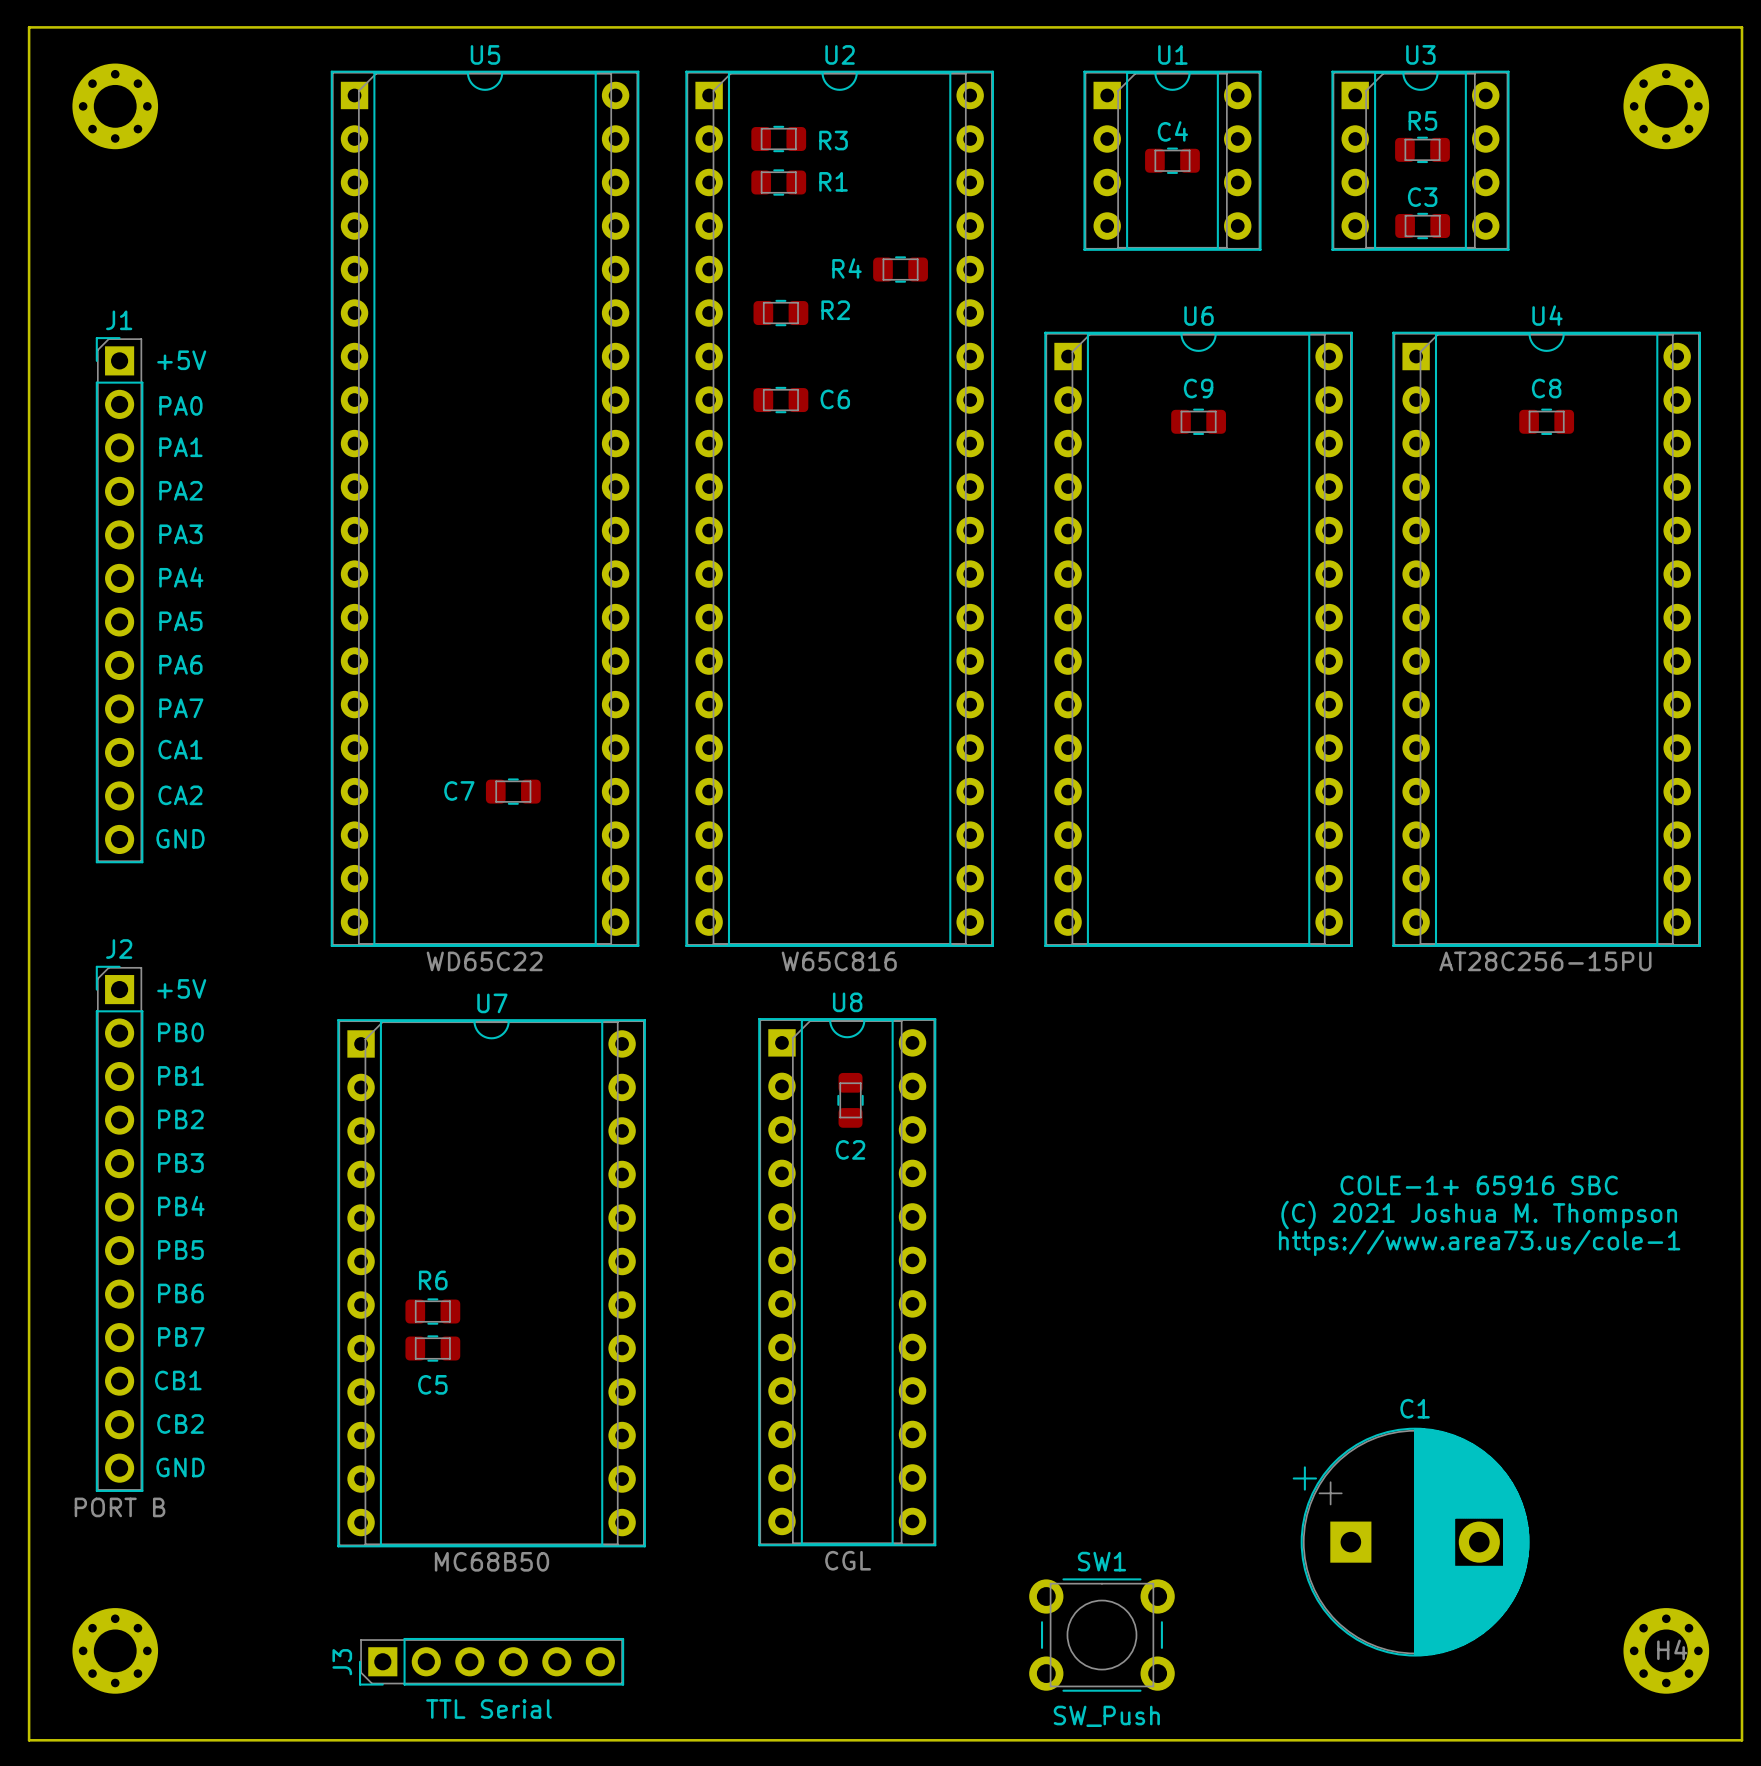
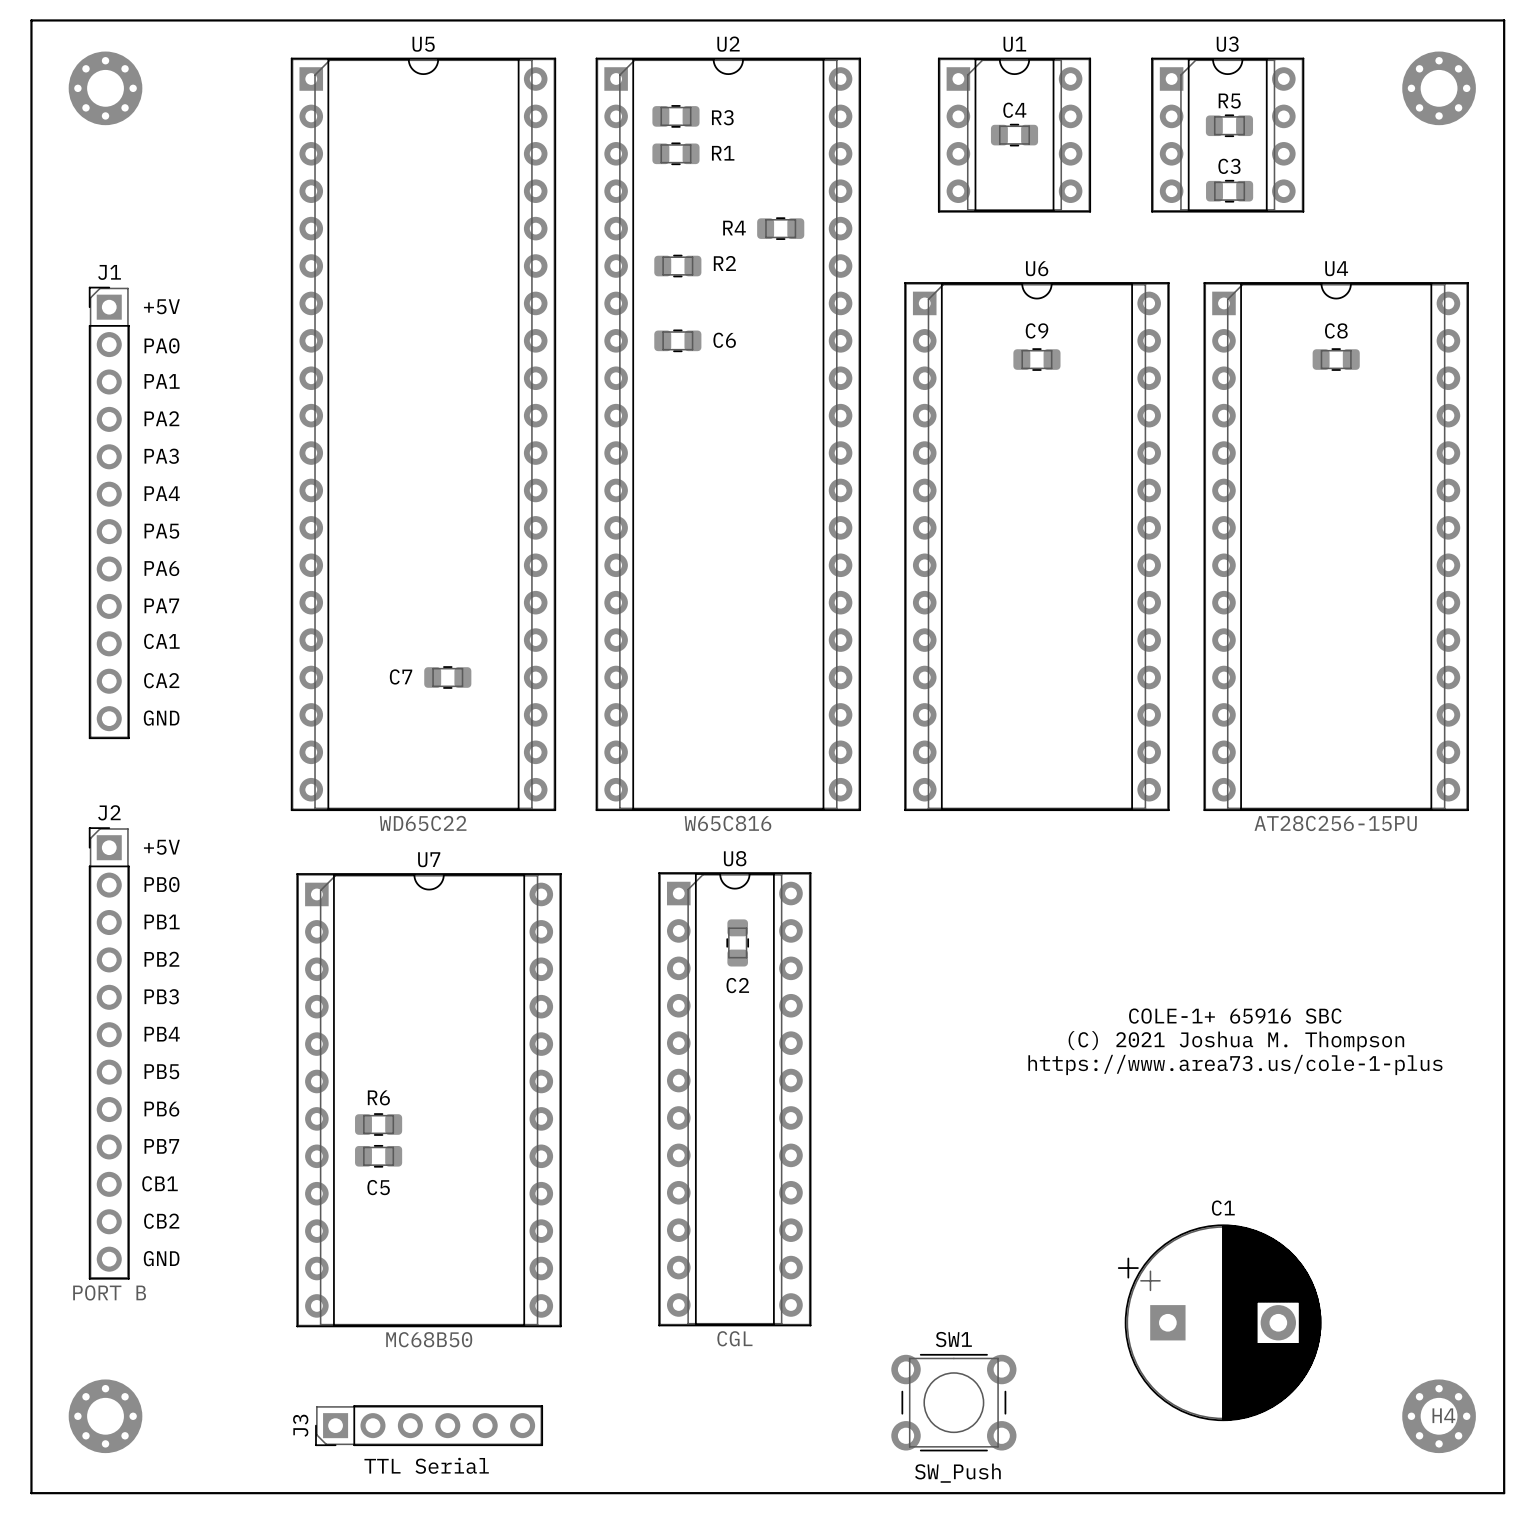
text position: COLE-1+ 65916 SBC (1479, 1185) -> COLE-1+ 65916 SBC (1235, 1016)
text position: (C) 2021 Joshua M. Thompson (1479, 1215) -> (C) 2021 Joshua M. Thompson (1236, 1041)
text: https://www.area73.us/cole-1 (1479, 1243) -> https://www.area73.us/cole-1-plus (1235, 1064)

